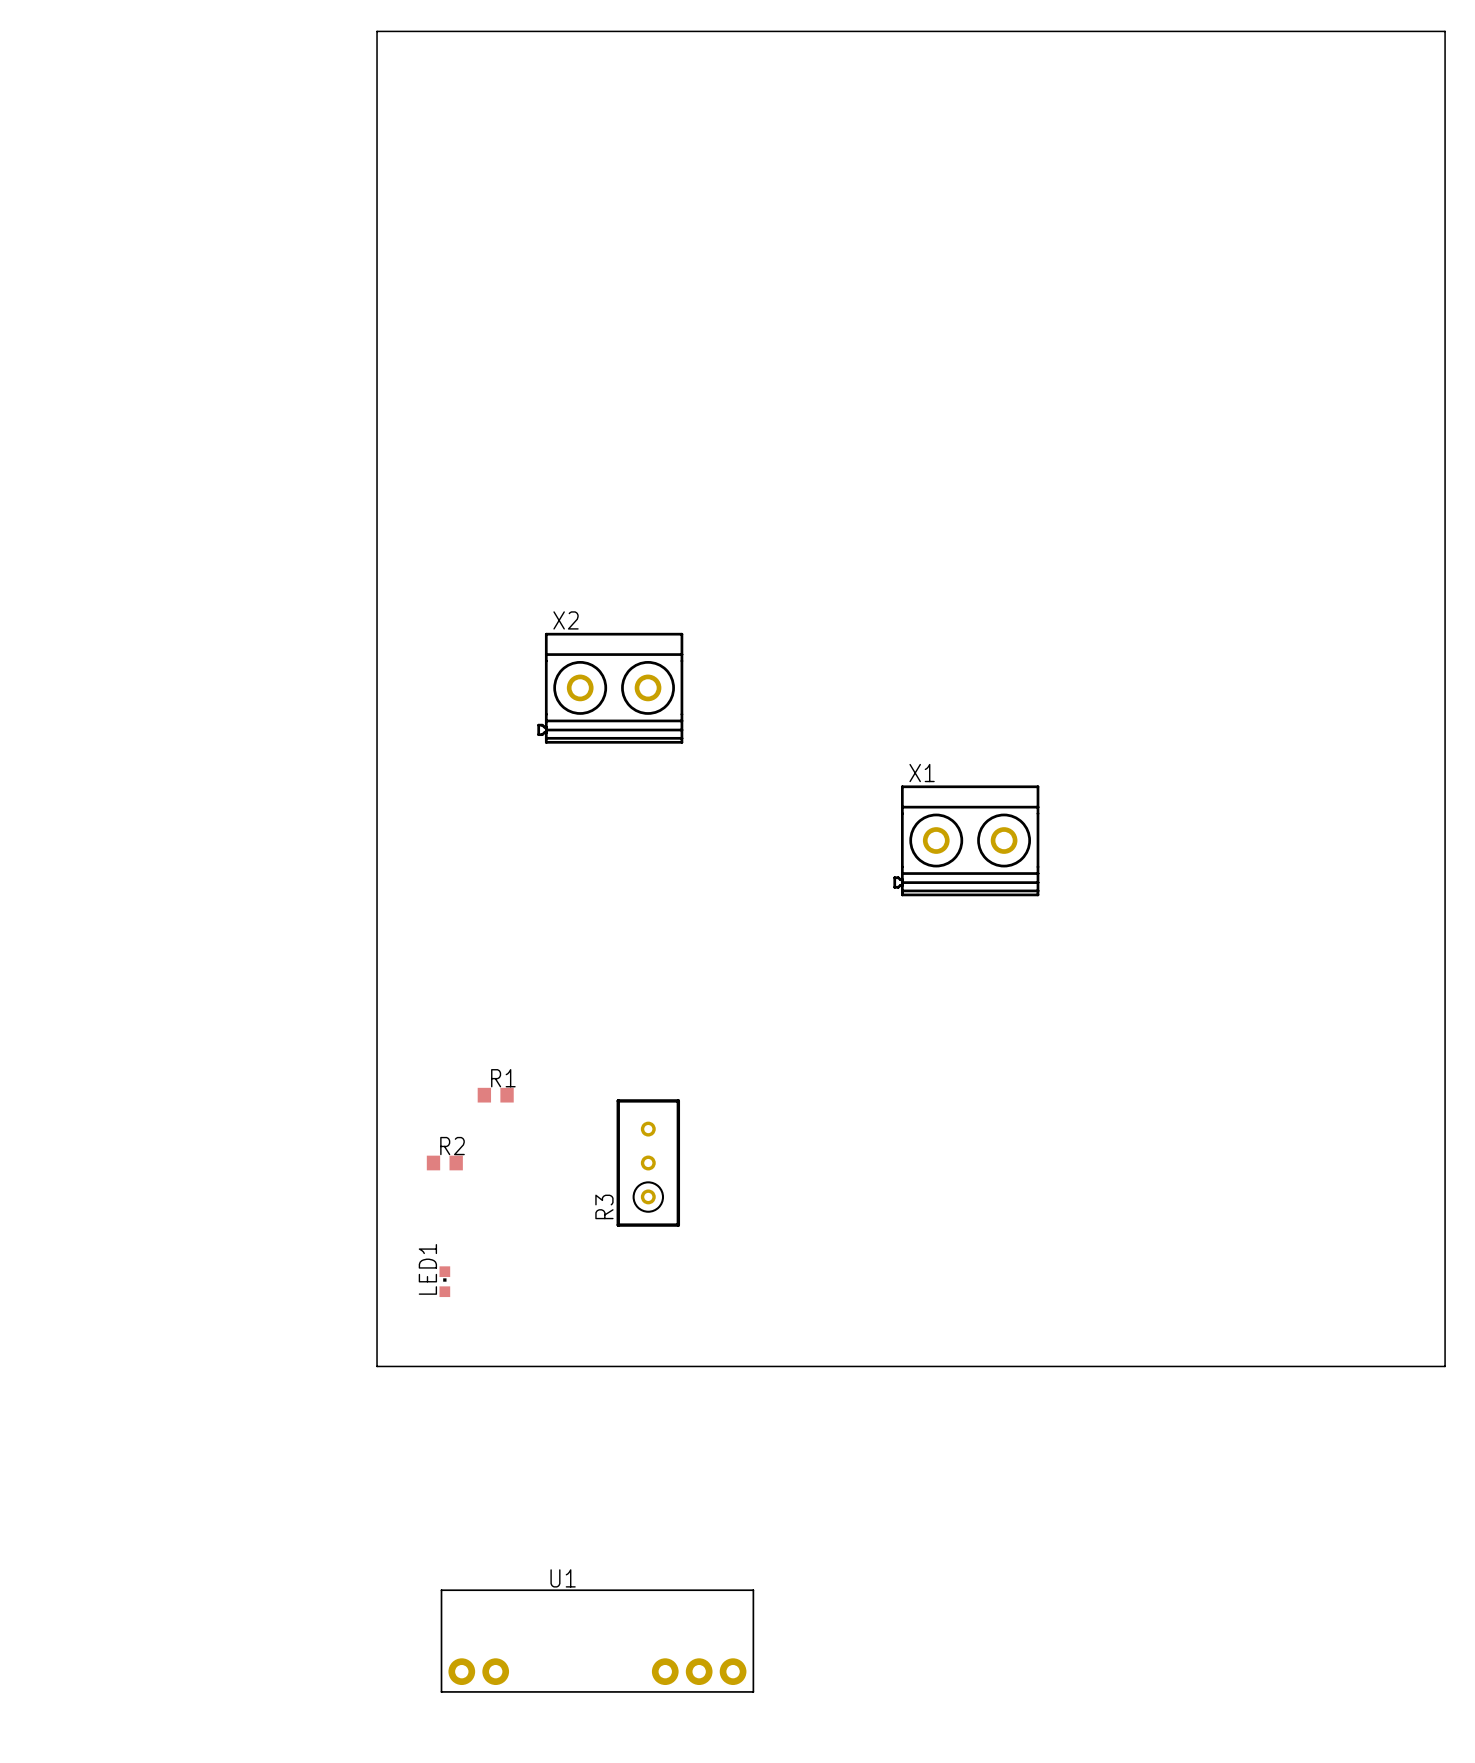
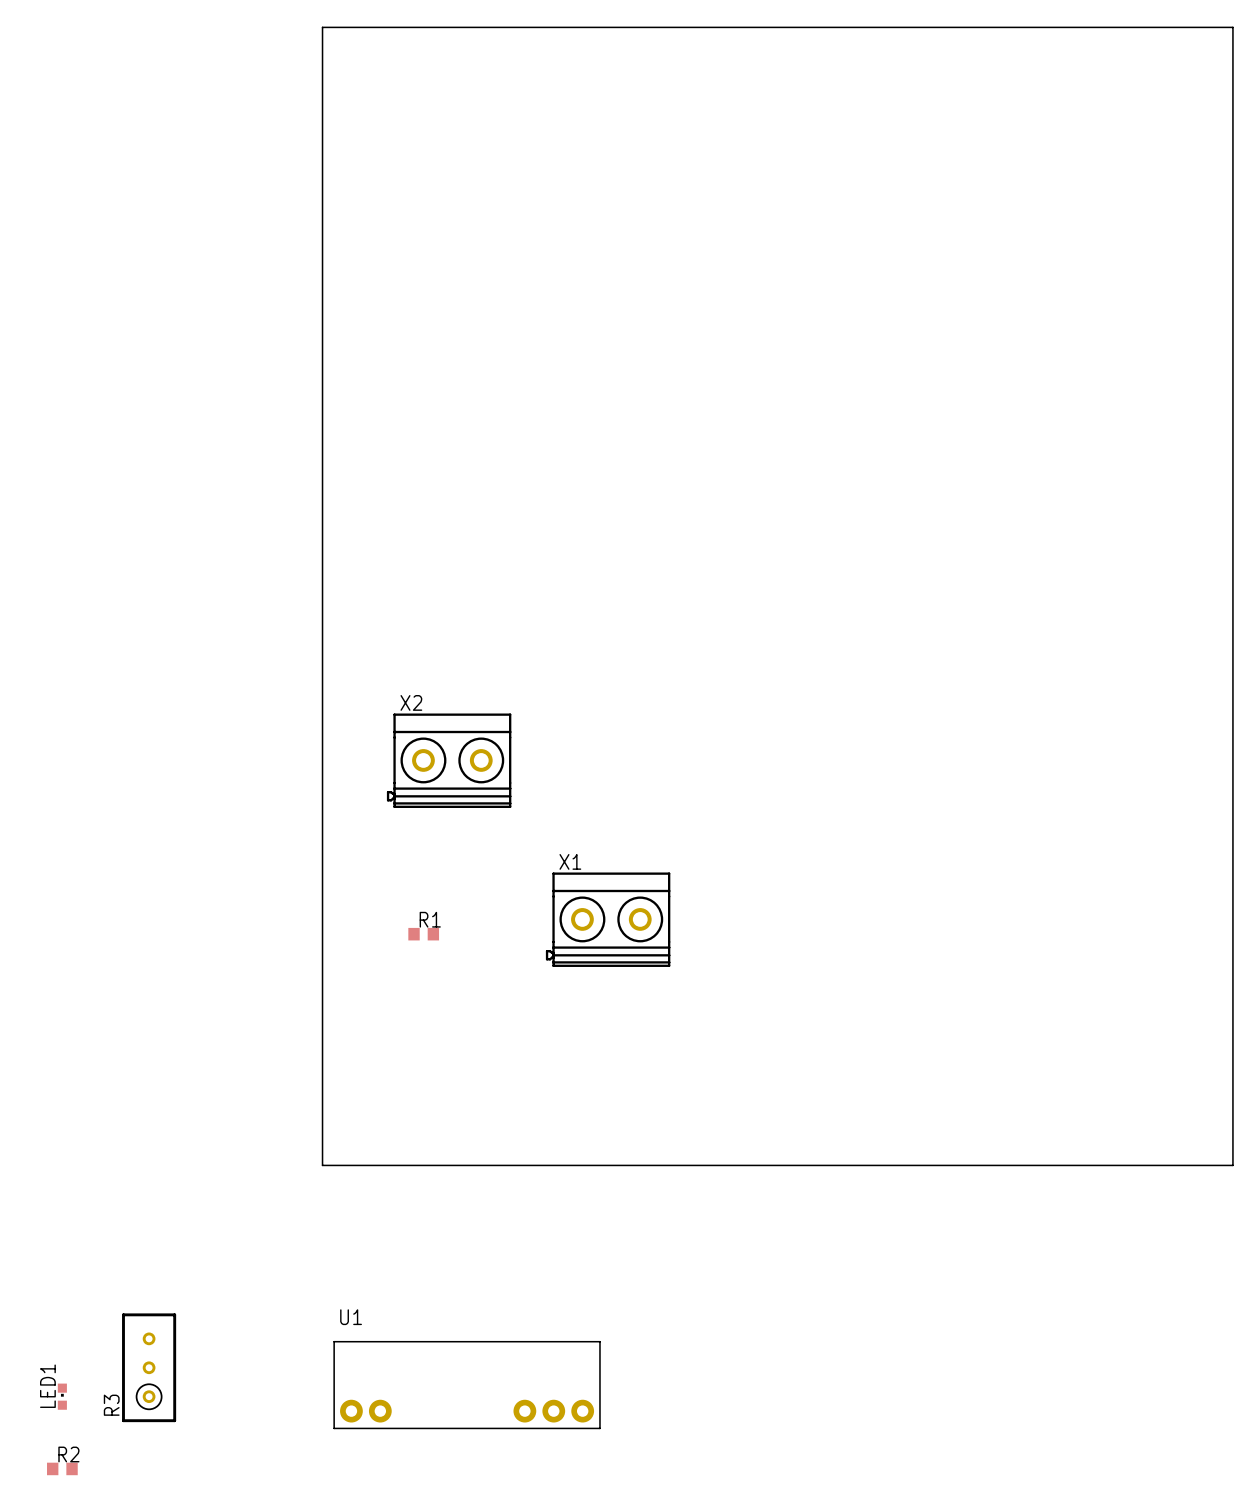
X2 position: (610, 688) -> (449, 760)
X1 position: (966, 840) -> (608, 919)
R2 position: (444, 1163) -> (62, 1468)
R3 position: (648, 1163) -> (149, 1367)
LED1 position: (444, 1281) -> (62, 1396)
U1 name position: U1 (563, 1578) -> U1 (351, 1317)
U1 position: (597, 1641) -> (467, 1385)

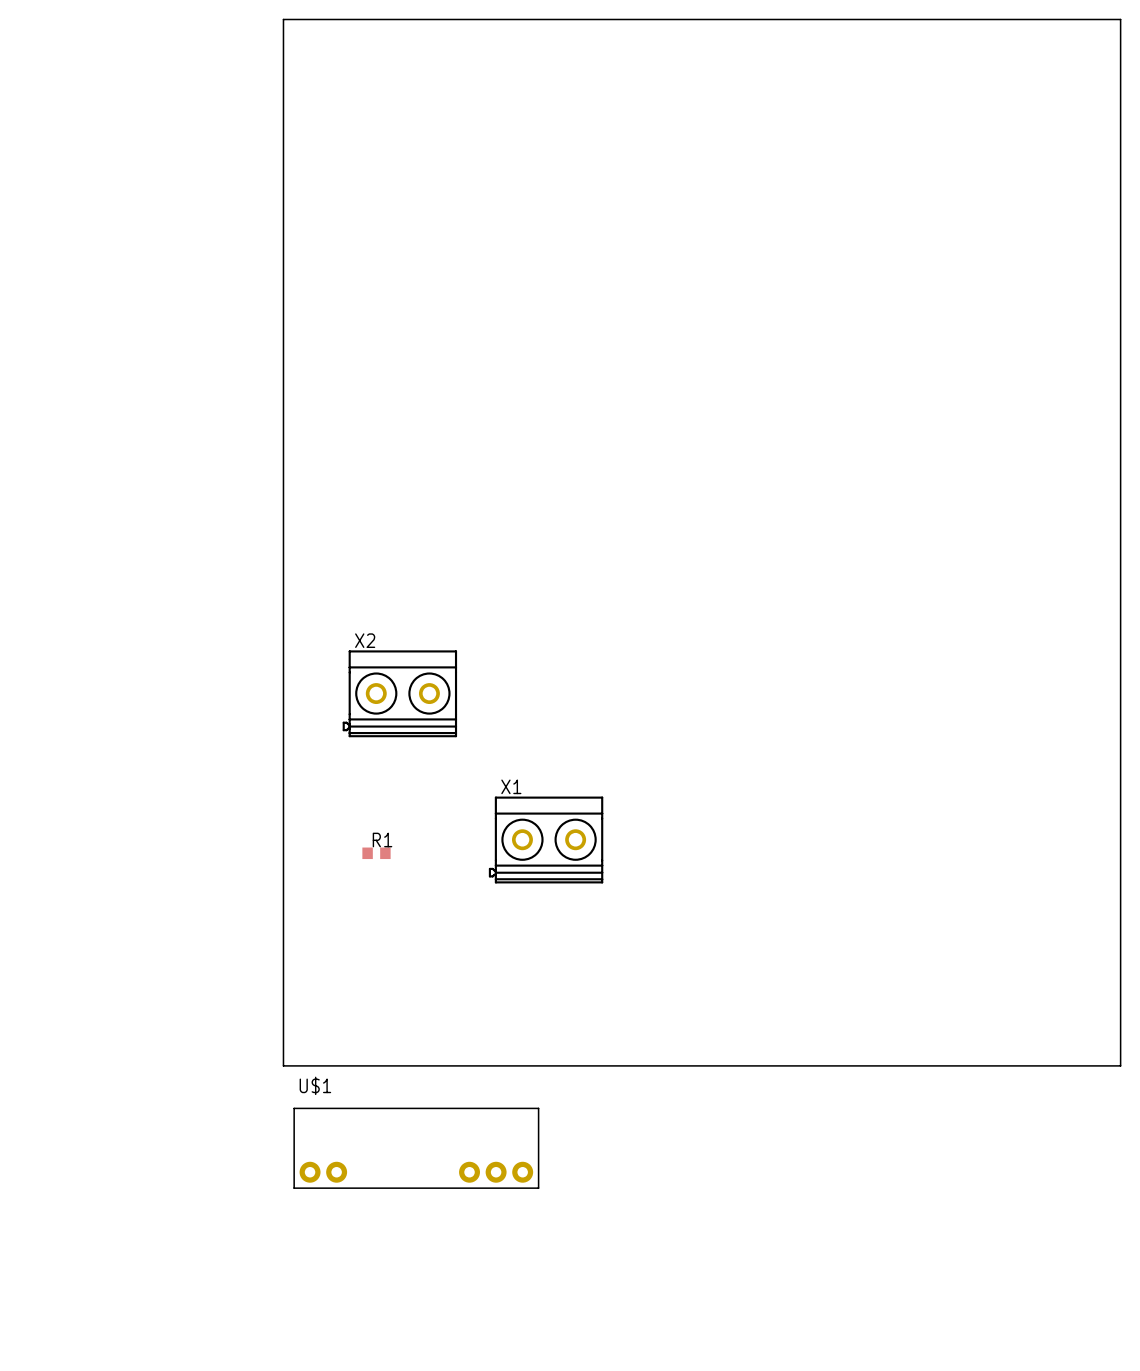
U$1: none -> (416, 1148)
R3: (149, 1367) -> none
U1: (467, 1385) -> none
LED1: (62, 1396) -> none
R2: (62, 1468) -> none

